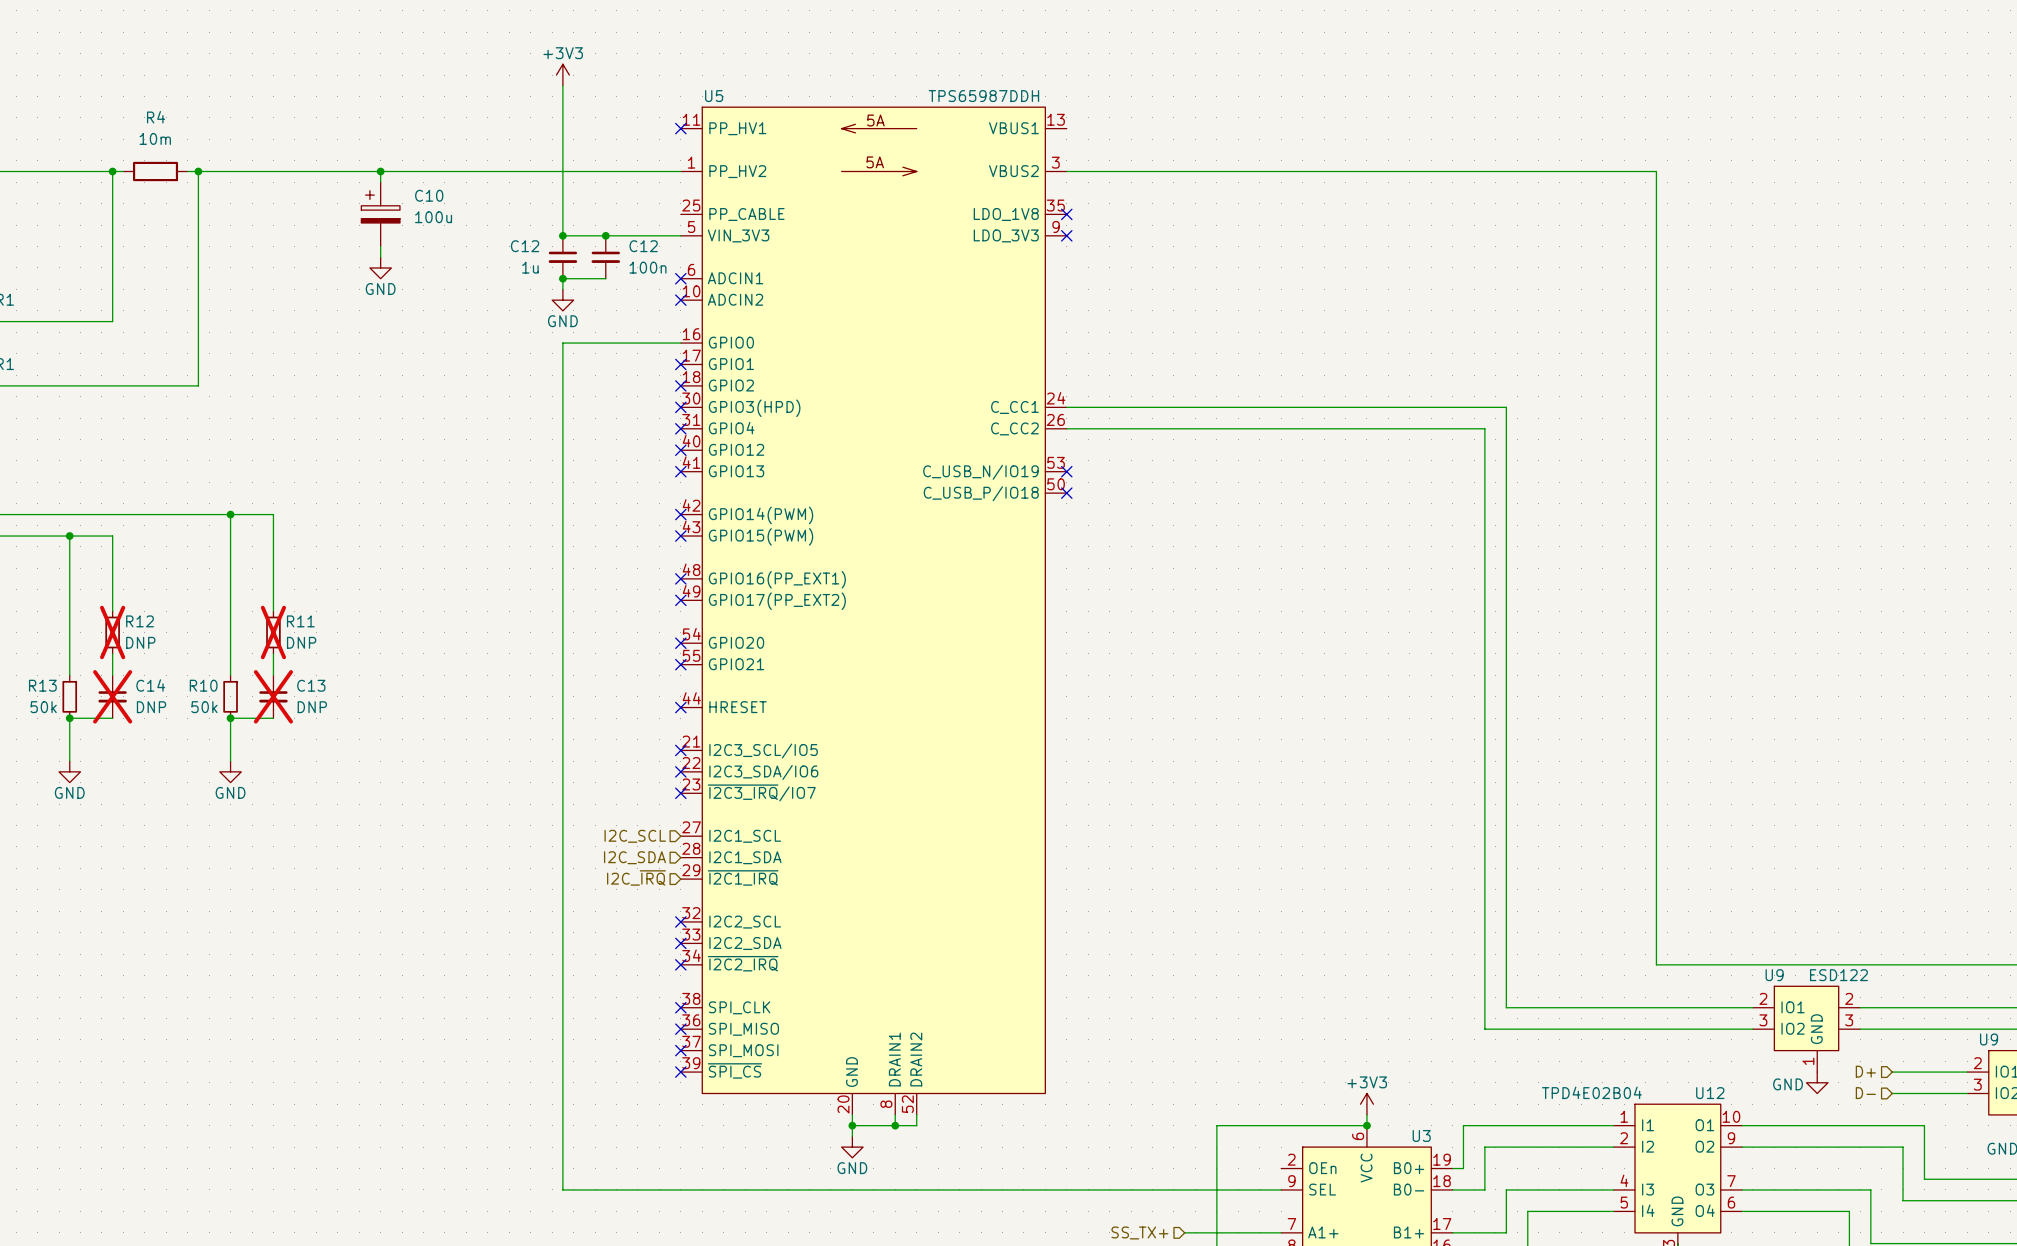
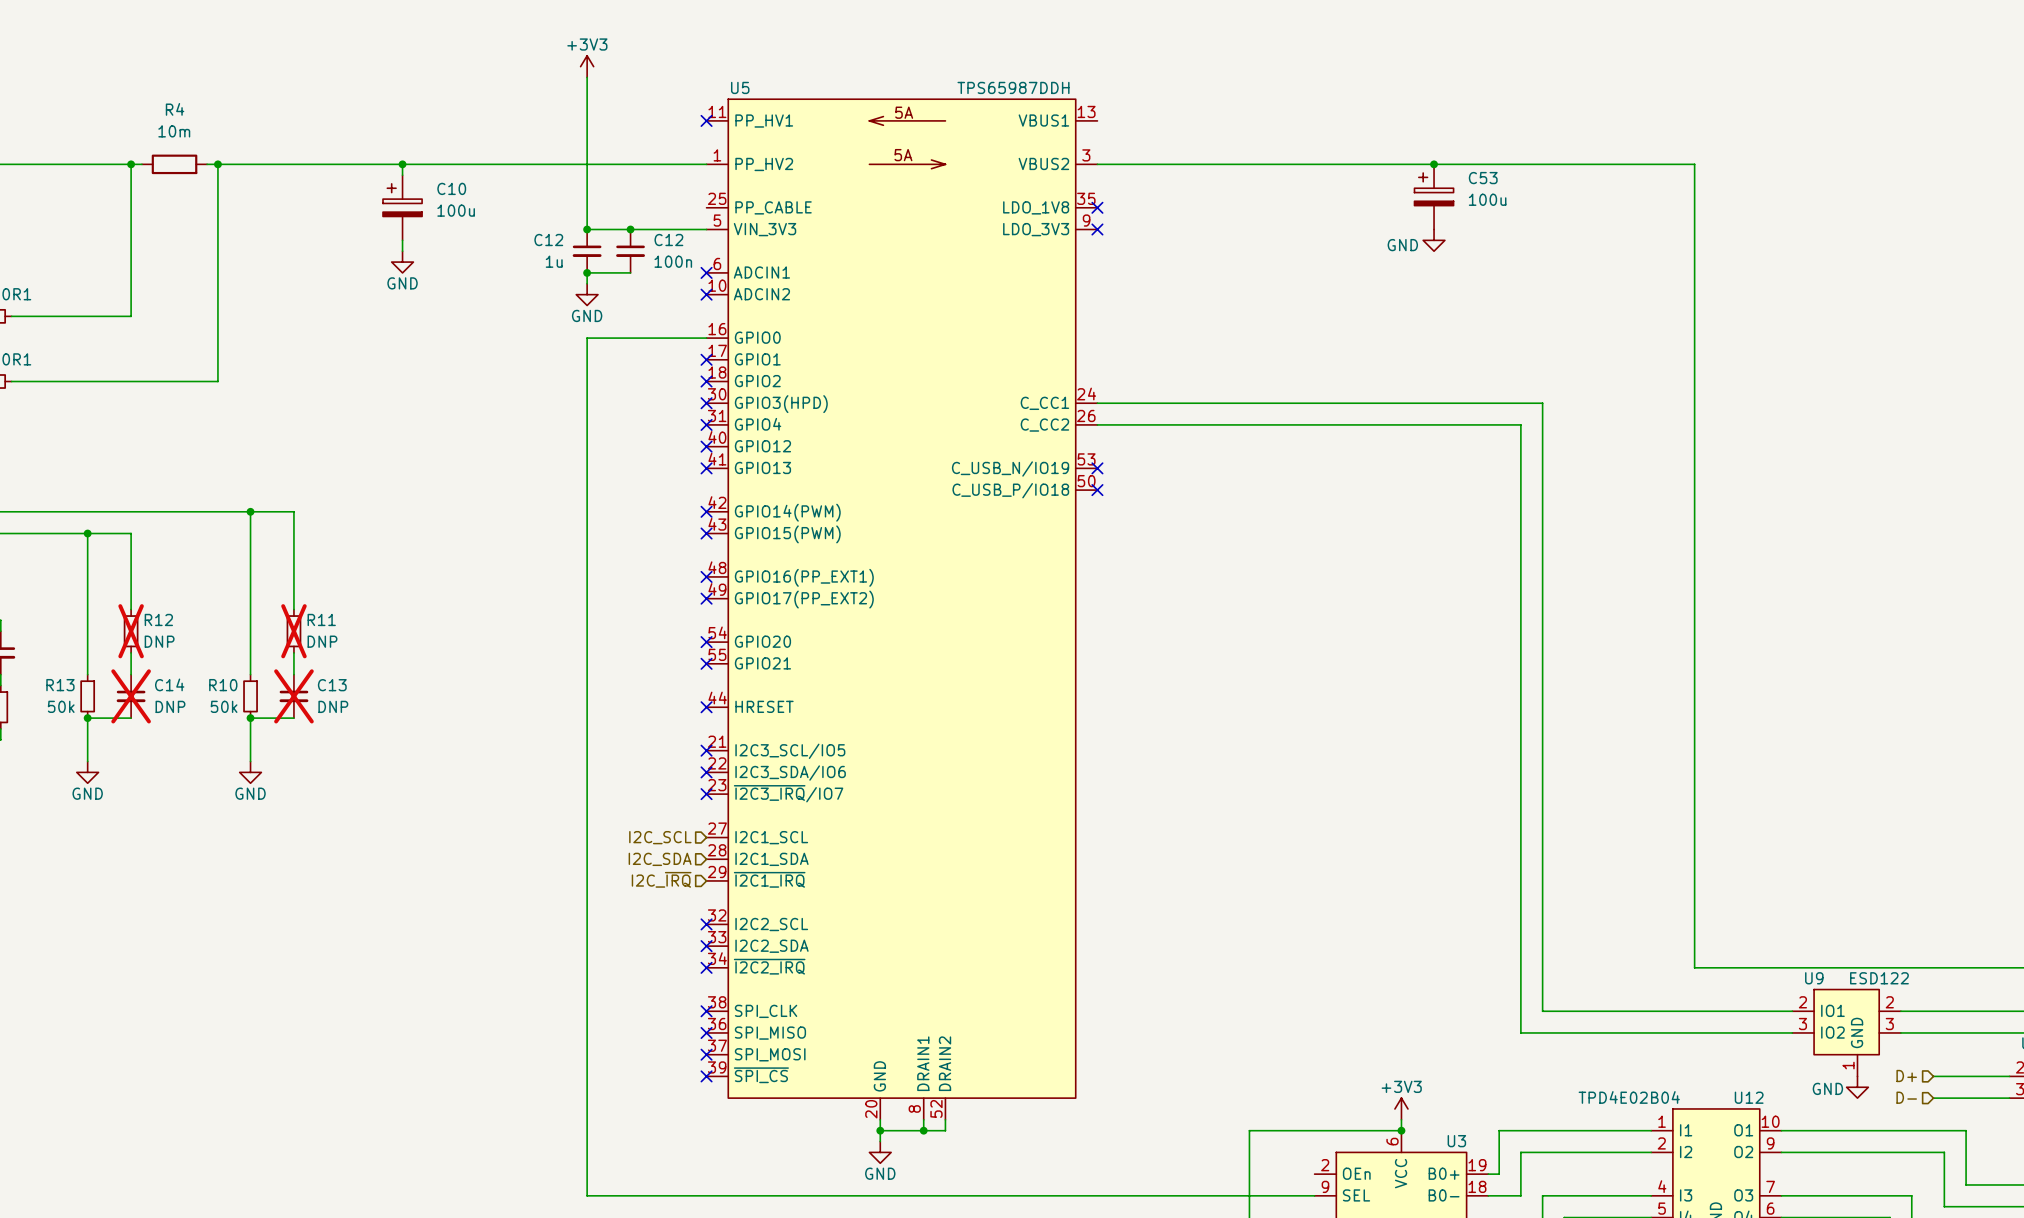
junction: none -> (1434, 164)
C53: none -> 100u (1434, 196)
power symbol: none -> GND (1434, 240)

